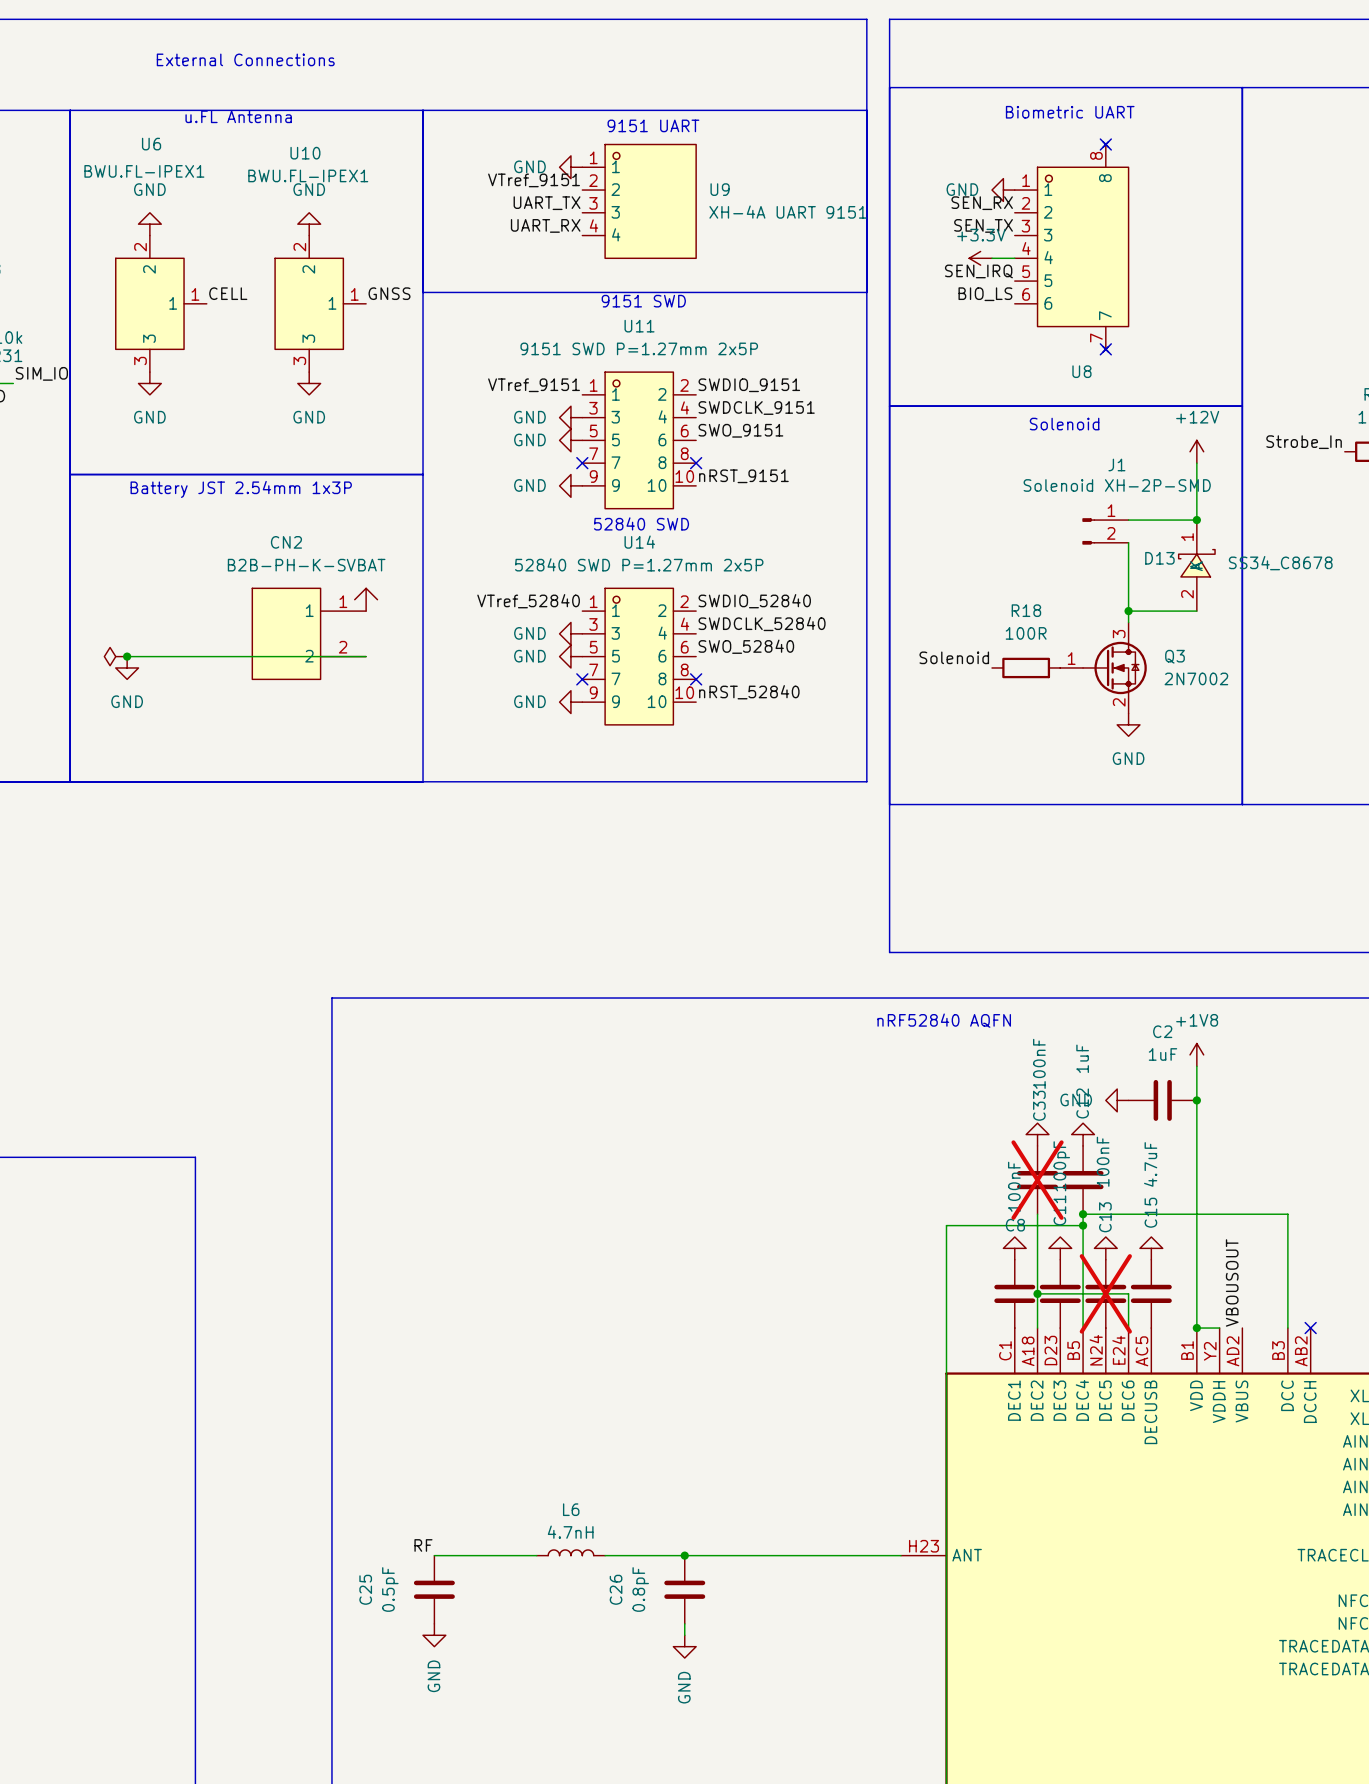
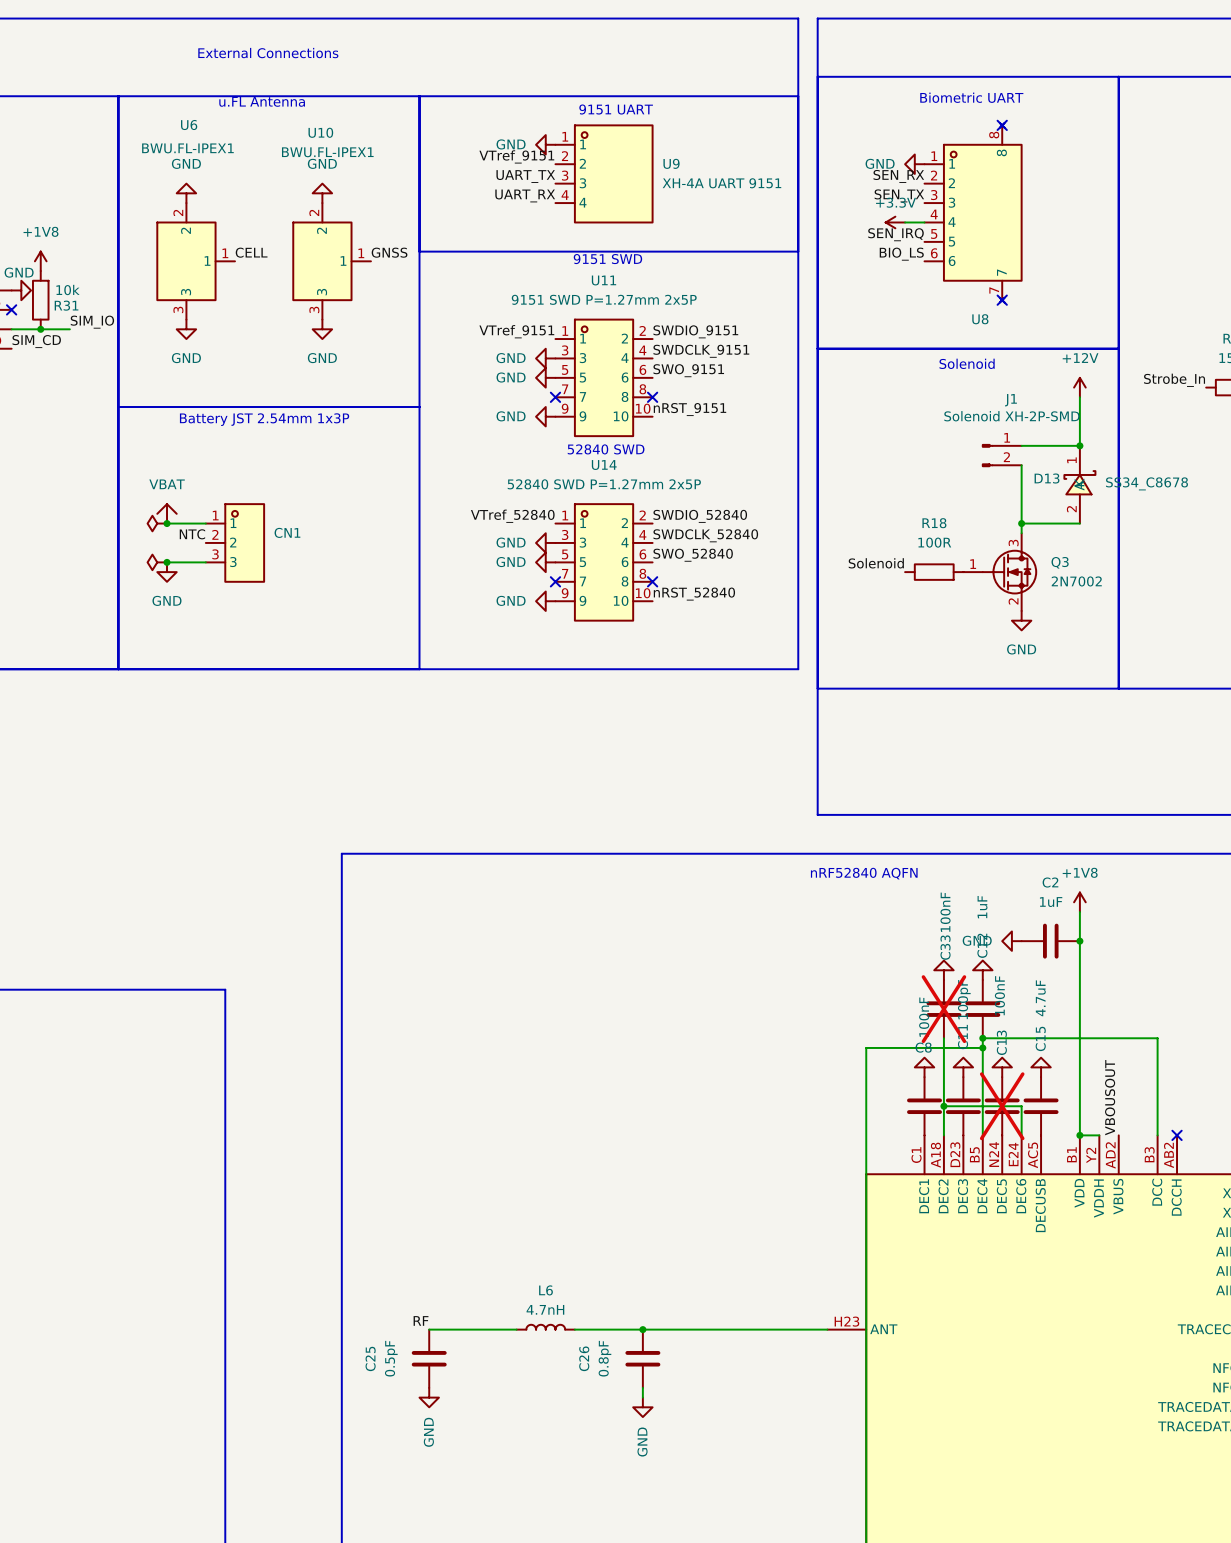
power symbol: none -> VBAT (167, 513)
power symbol: VBAT (366, 599) -> none
power symbol: none -> (157, 523)
wire: none -> (167, 523) (205, 523)
junction: none -> (167, 523)
label: none -> NTC (192, 534)
CN1: none -> (234, 542)
CN2: B2B-PH-K-S (309, 633) -> none
wire: (172, 656) (366, 656) -> none

